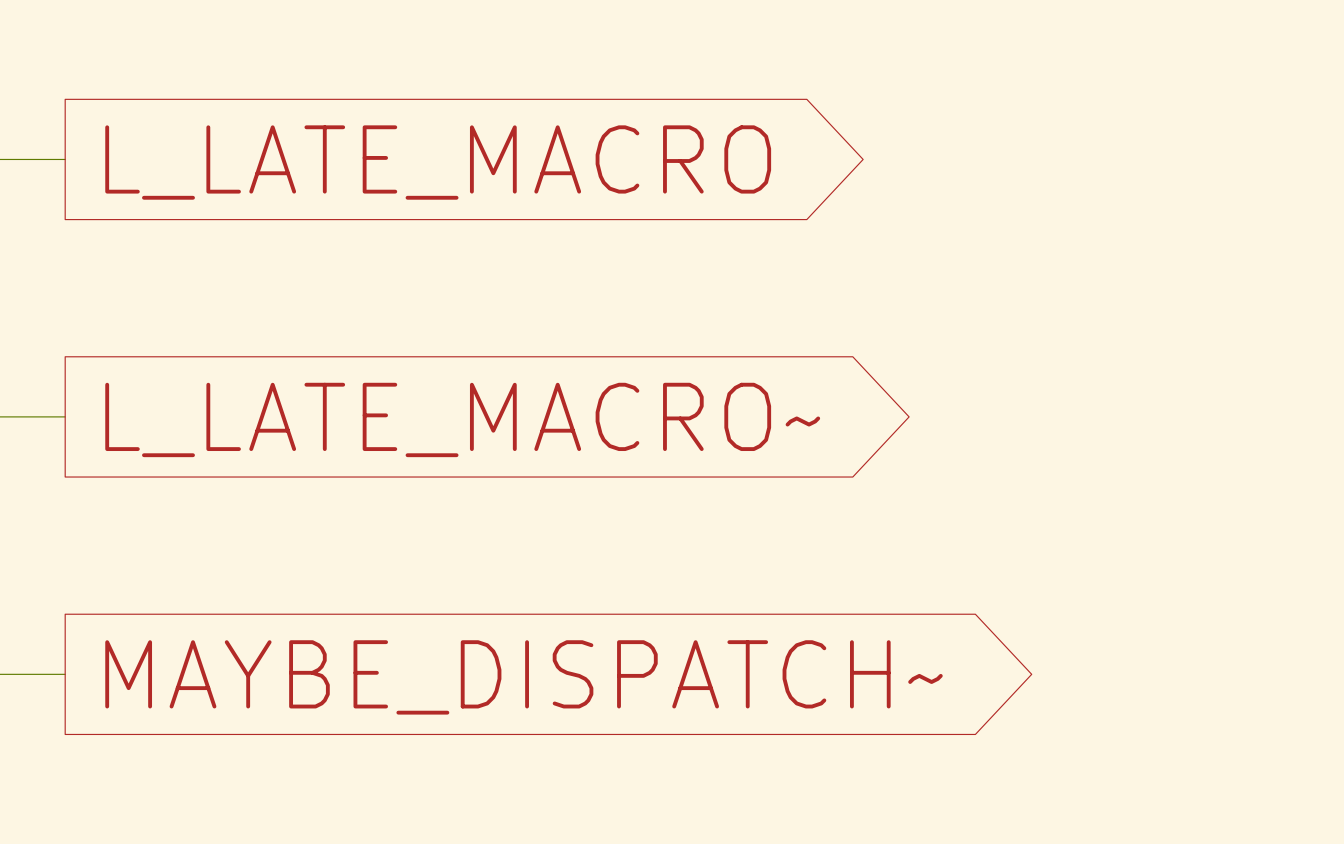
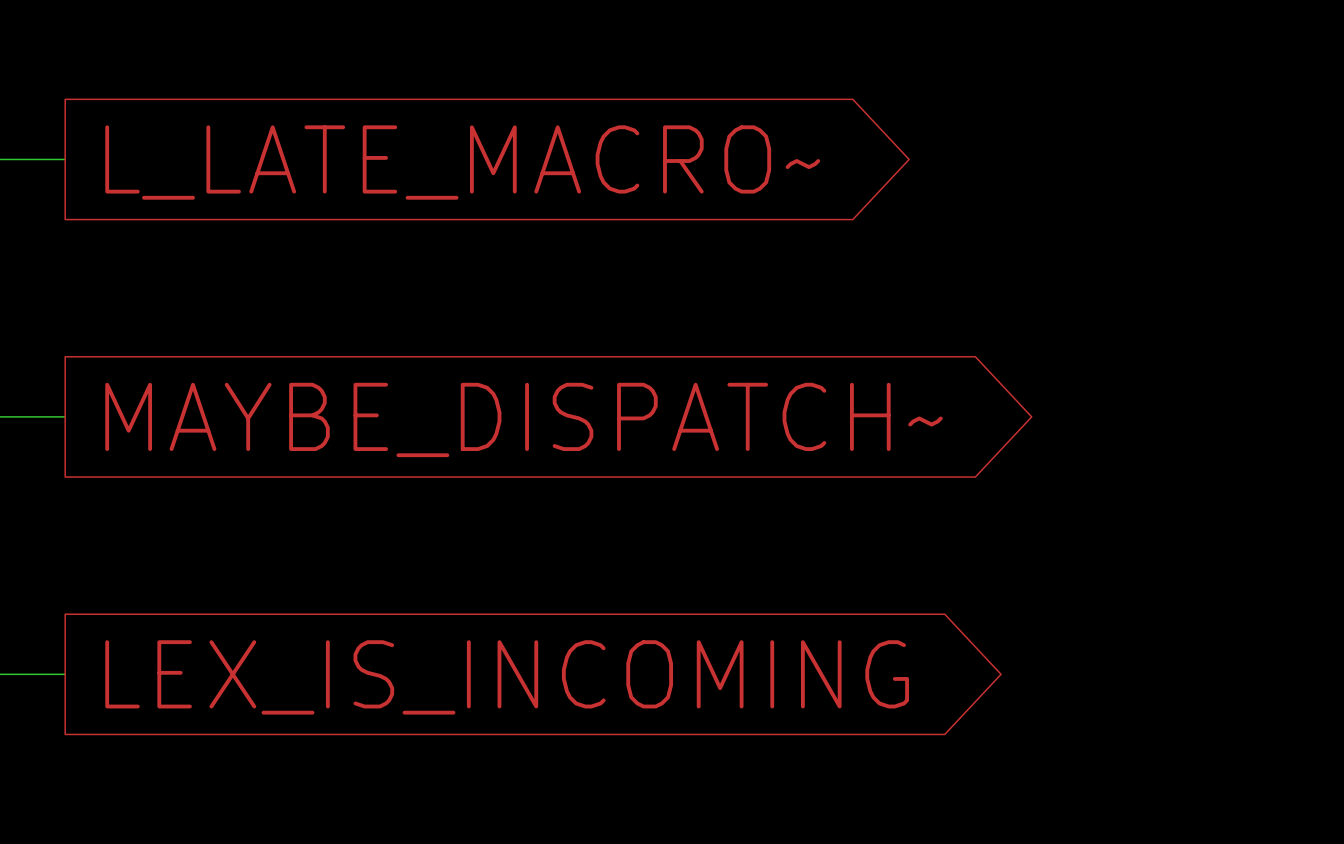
global label: L_LATE_MACRO (438, 162) -> L_LATE_MACRO~ (462, 162)
global label: L_LATE_MACRO~ (462, 419) -> MAYBE_DISPATCH~ (523, 419)
global label: MAYBE_DISPATCH~ (523, 677) -> LEX_IS_INCOMING (507, 677)

